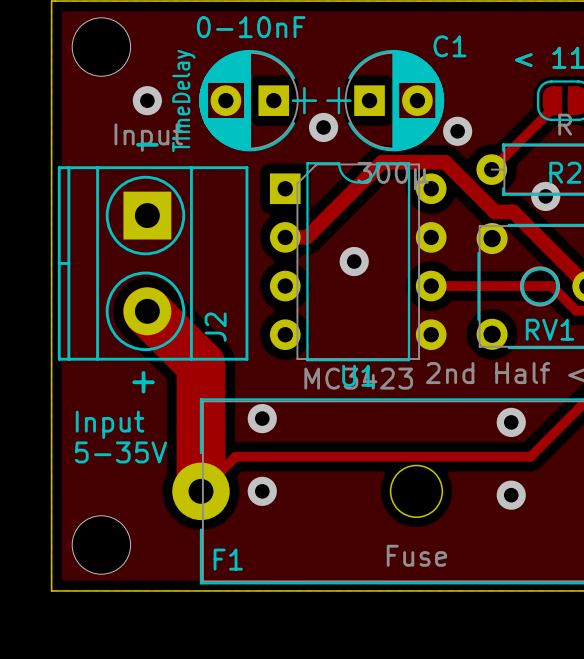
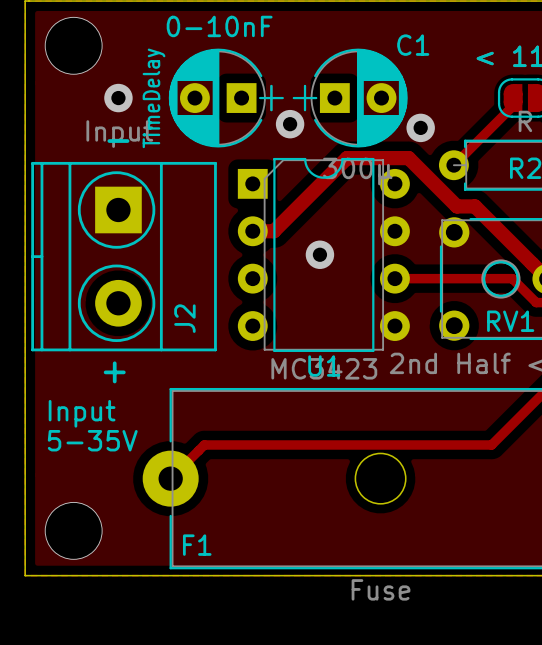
via: (545, 196) -> none
track: (147, 311) (201, 364) (201, 493) -> none
via: (262, 418) -> none
via: (511, 422) -> none
via: (262, 491) -> none
via: (511, 495) -> none
F1 value position: Fuse (416, 555) -> Fuse (381, 589)

